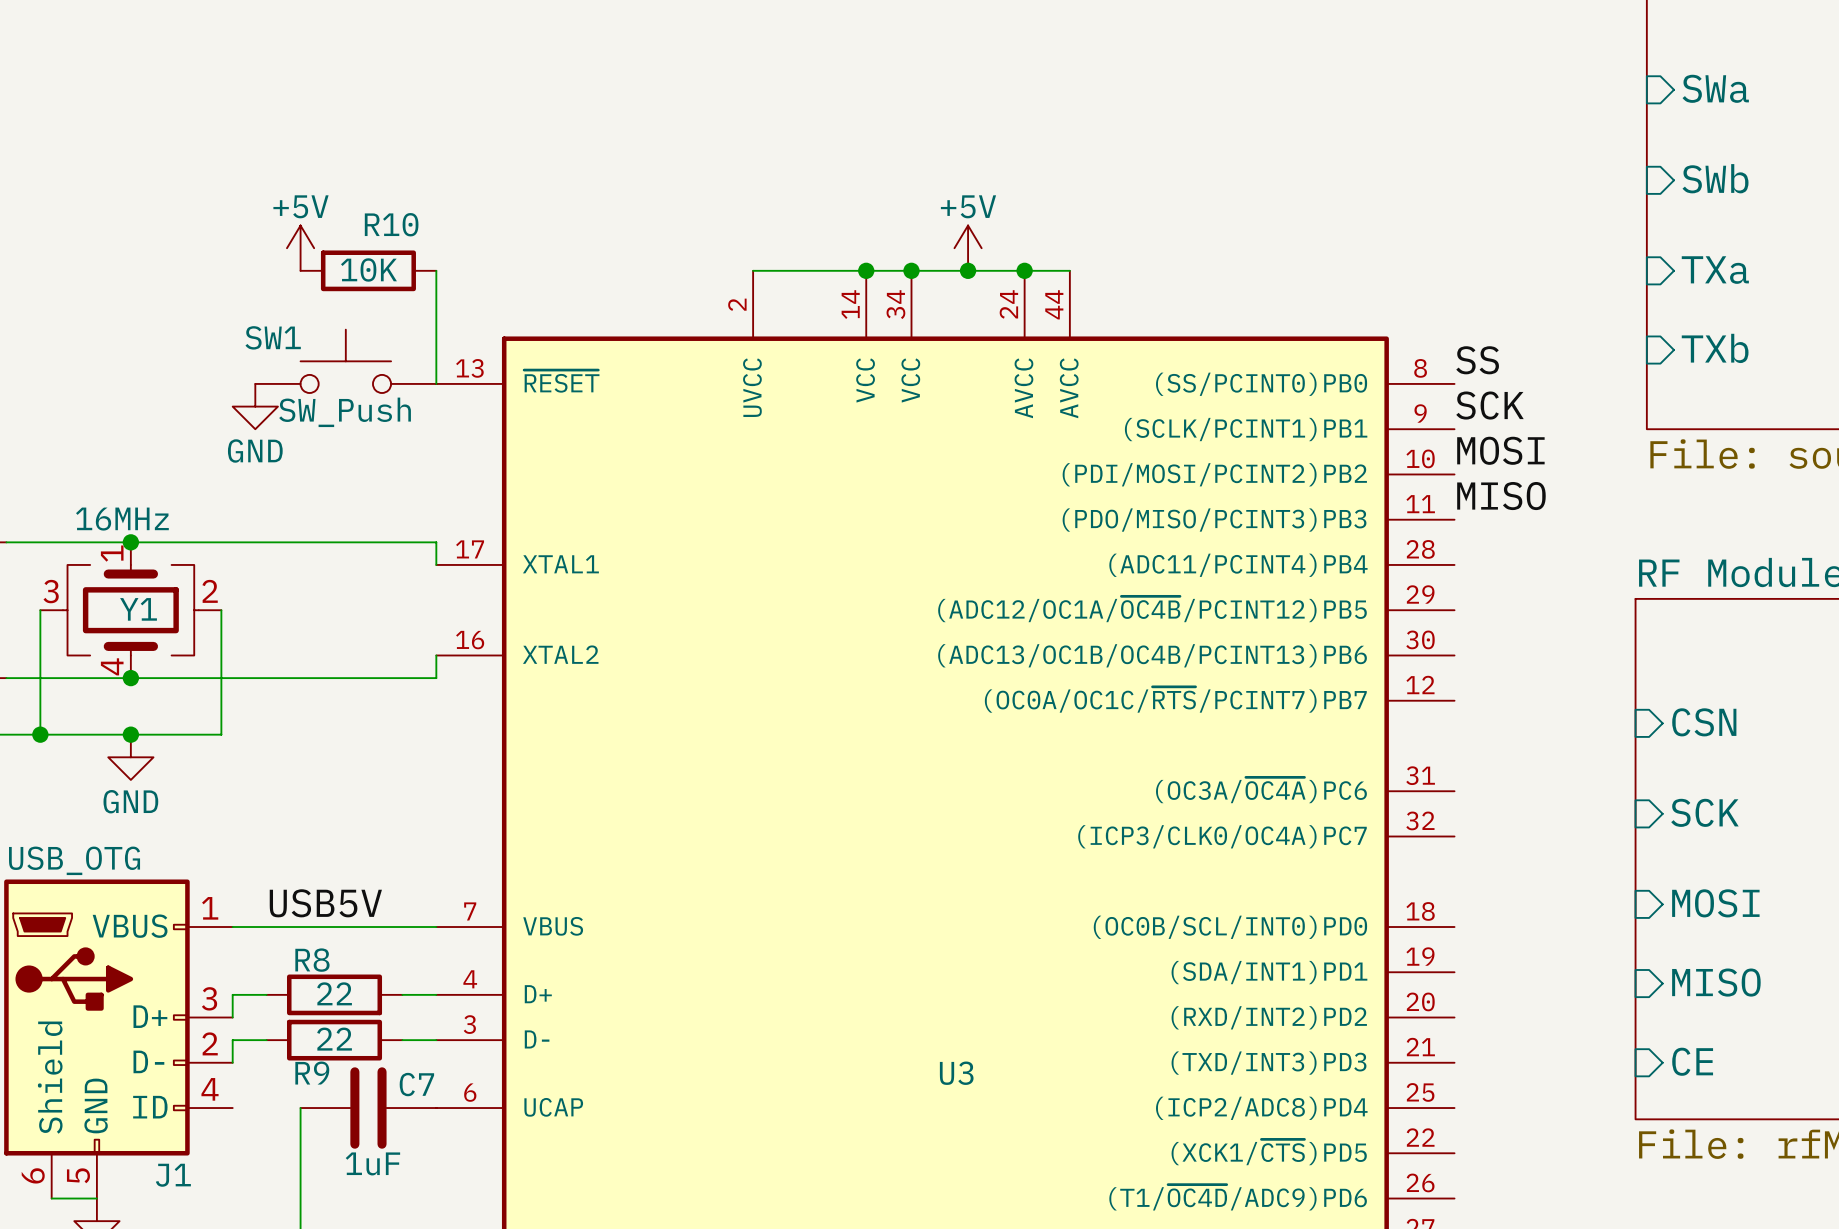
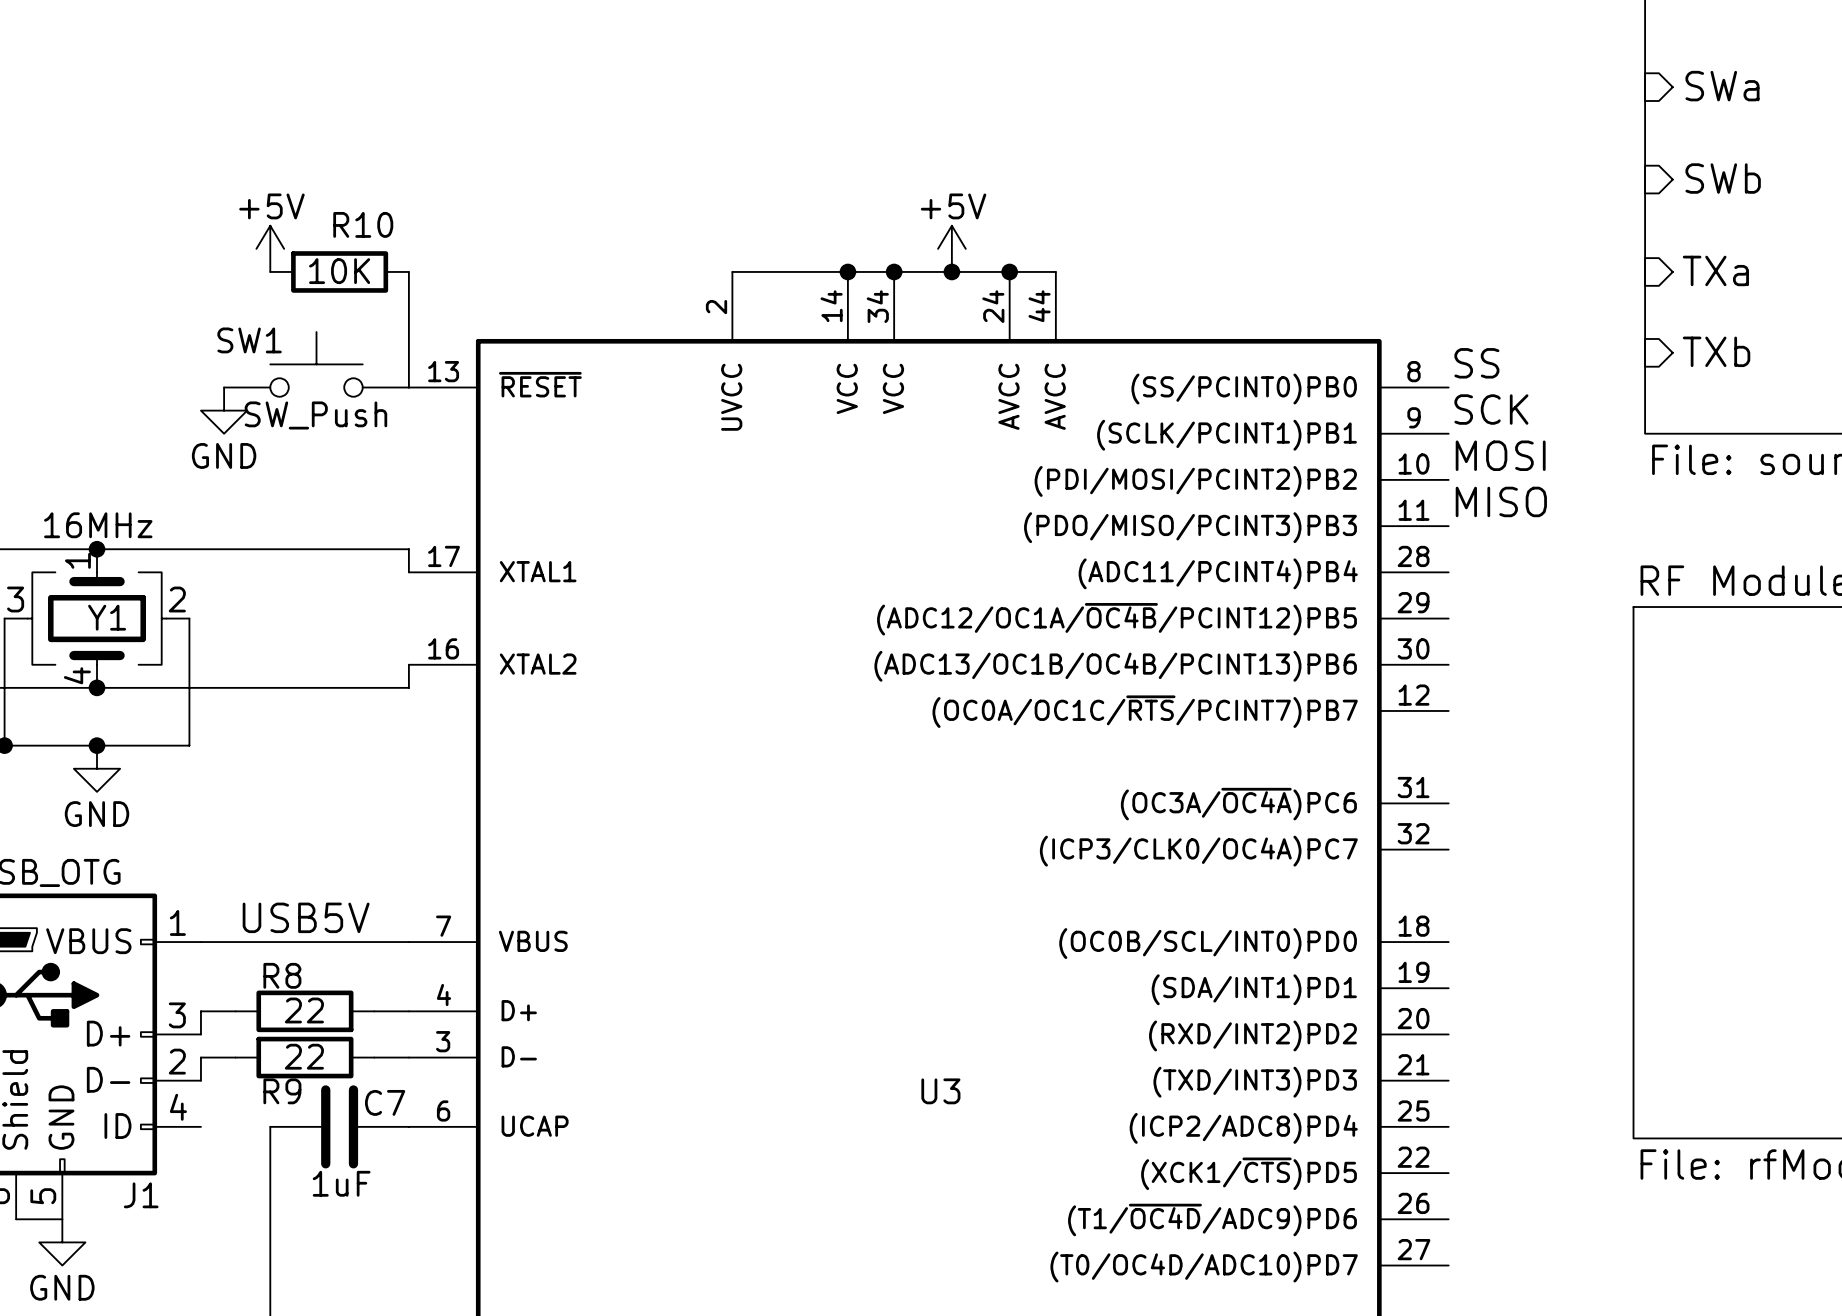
sheet pin: CSN (1704, 722) -> none
sheet pin: SCK (1704, 812) -> none
sheet pin: MOSI (1715, 903) -> none
sheet pin: MISO (1716, 982) -> none
sheet pin: CE (1692, 1061) -> none

